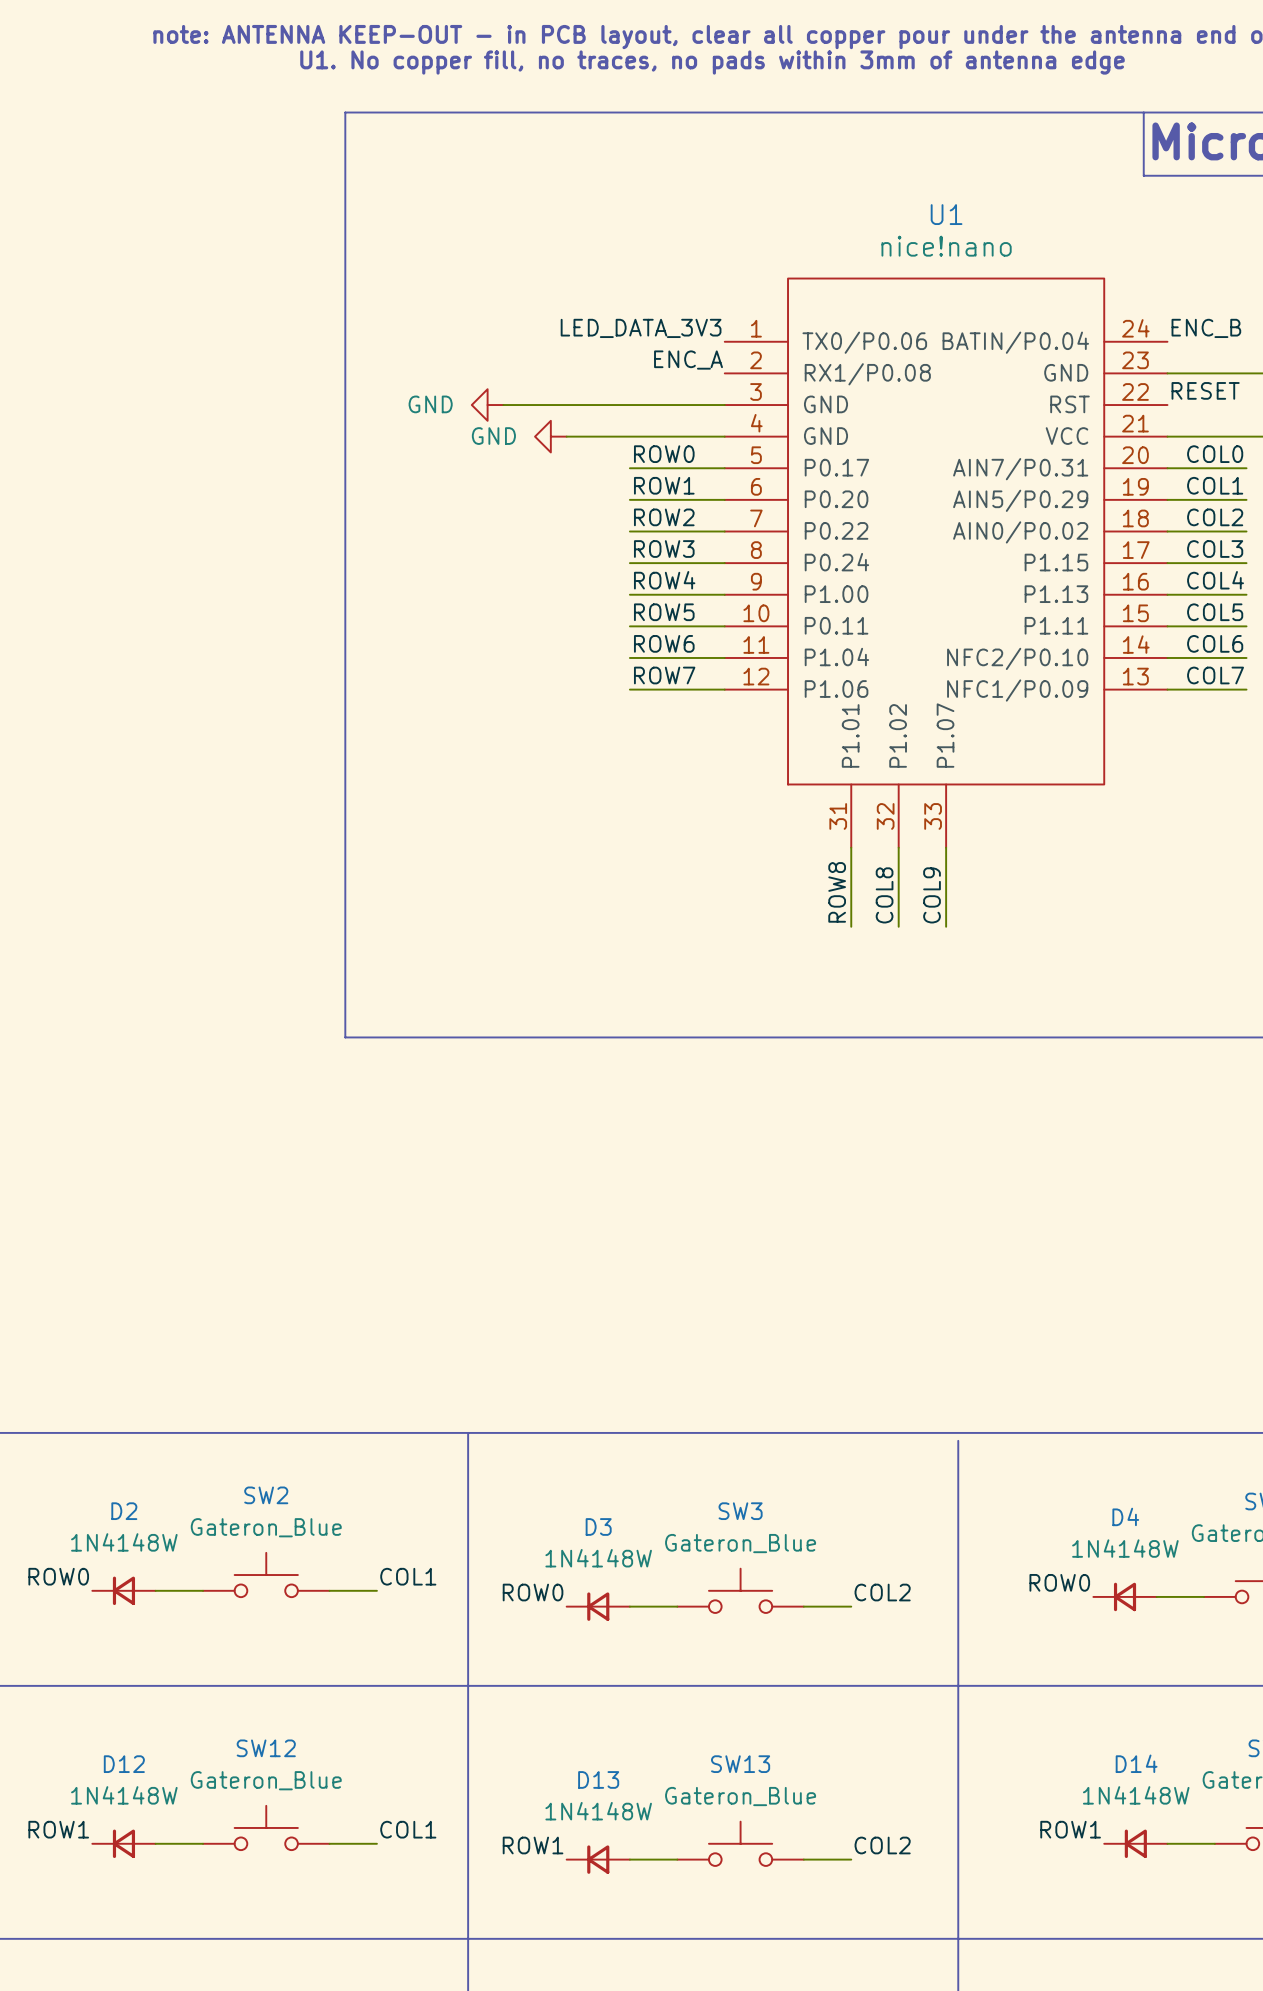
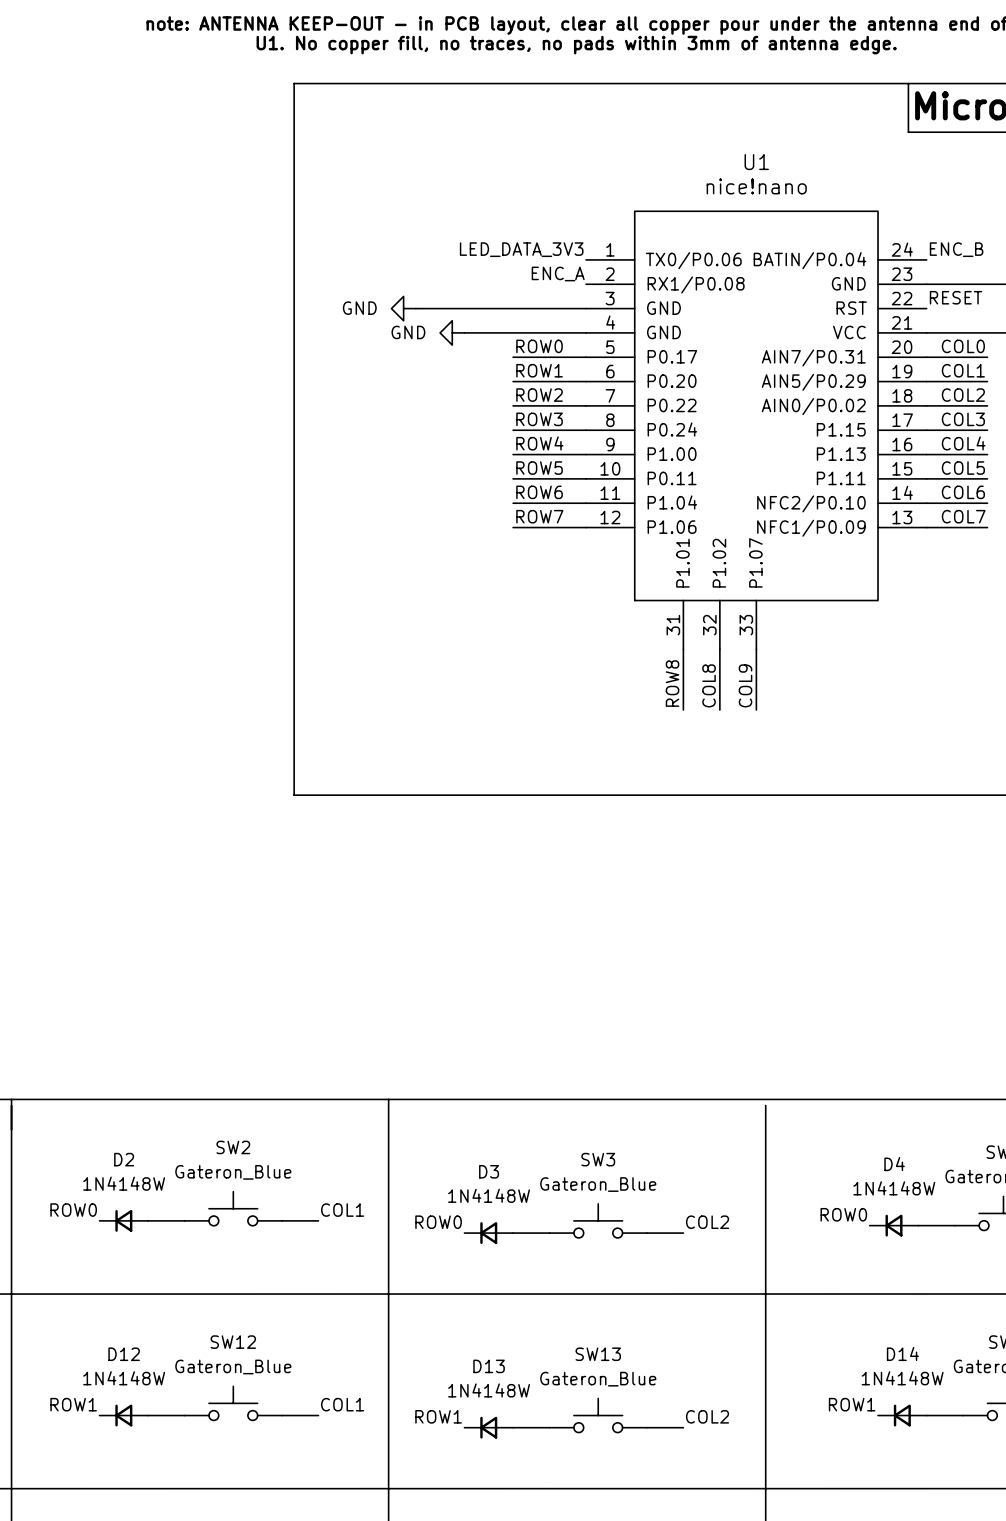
text: U1. No copper fill, no traces, no pads within 3mm of antenna edge (712, 62) -> U1. No copper fill, no traces, no pads within 3mm of antenna edge. (576, 45)

